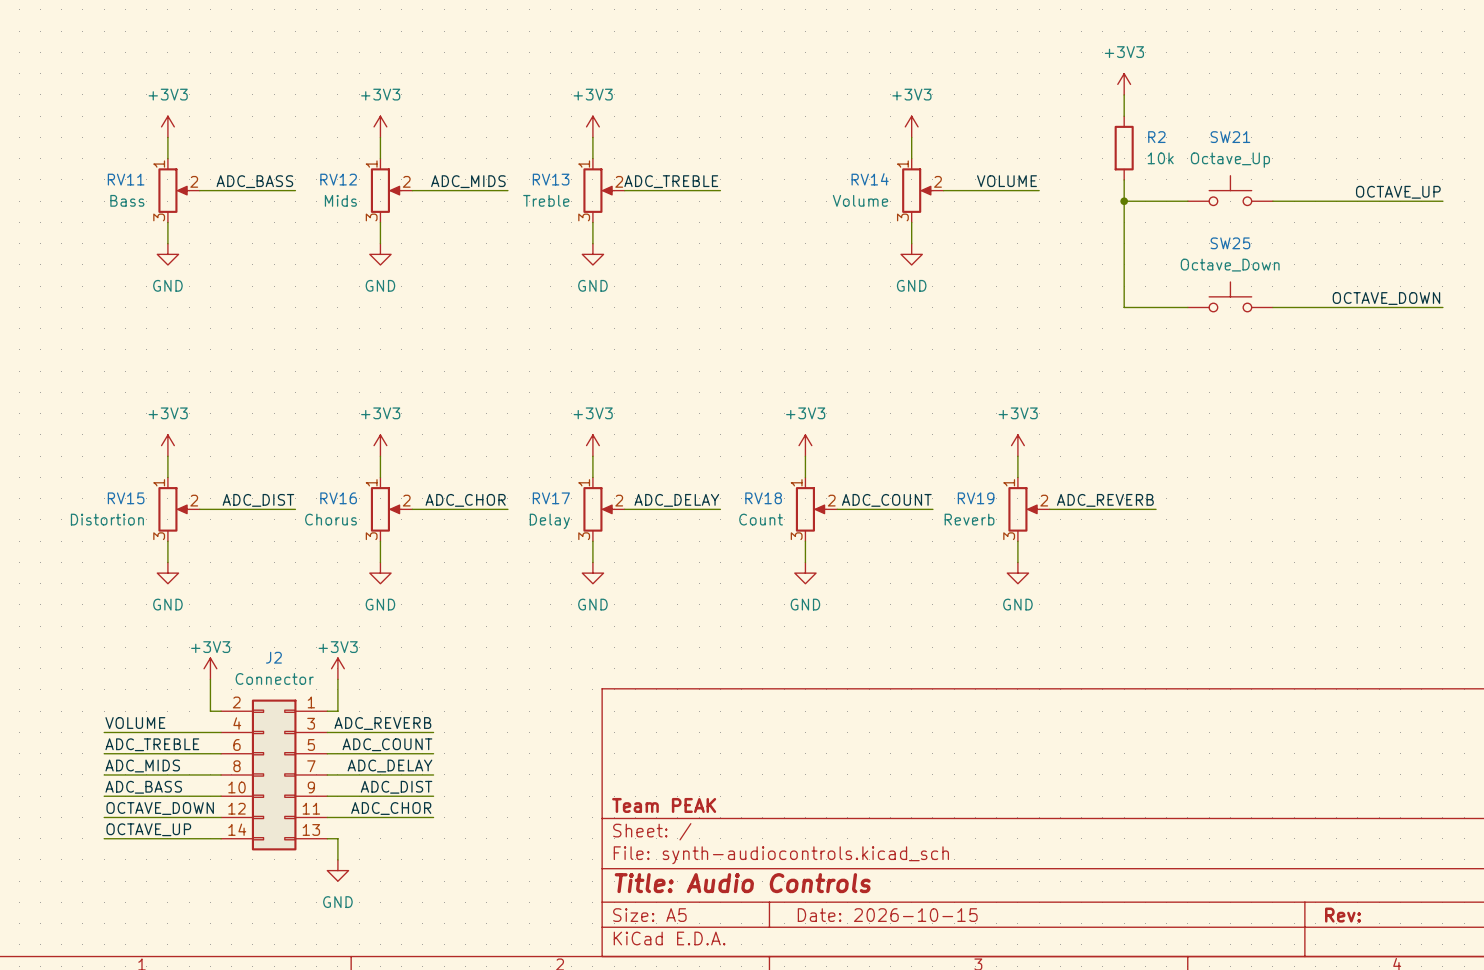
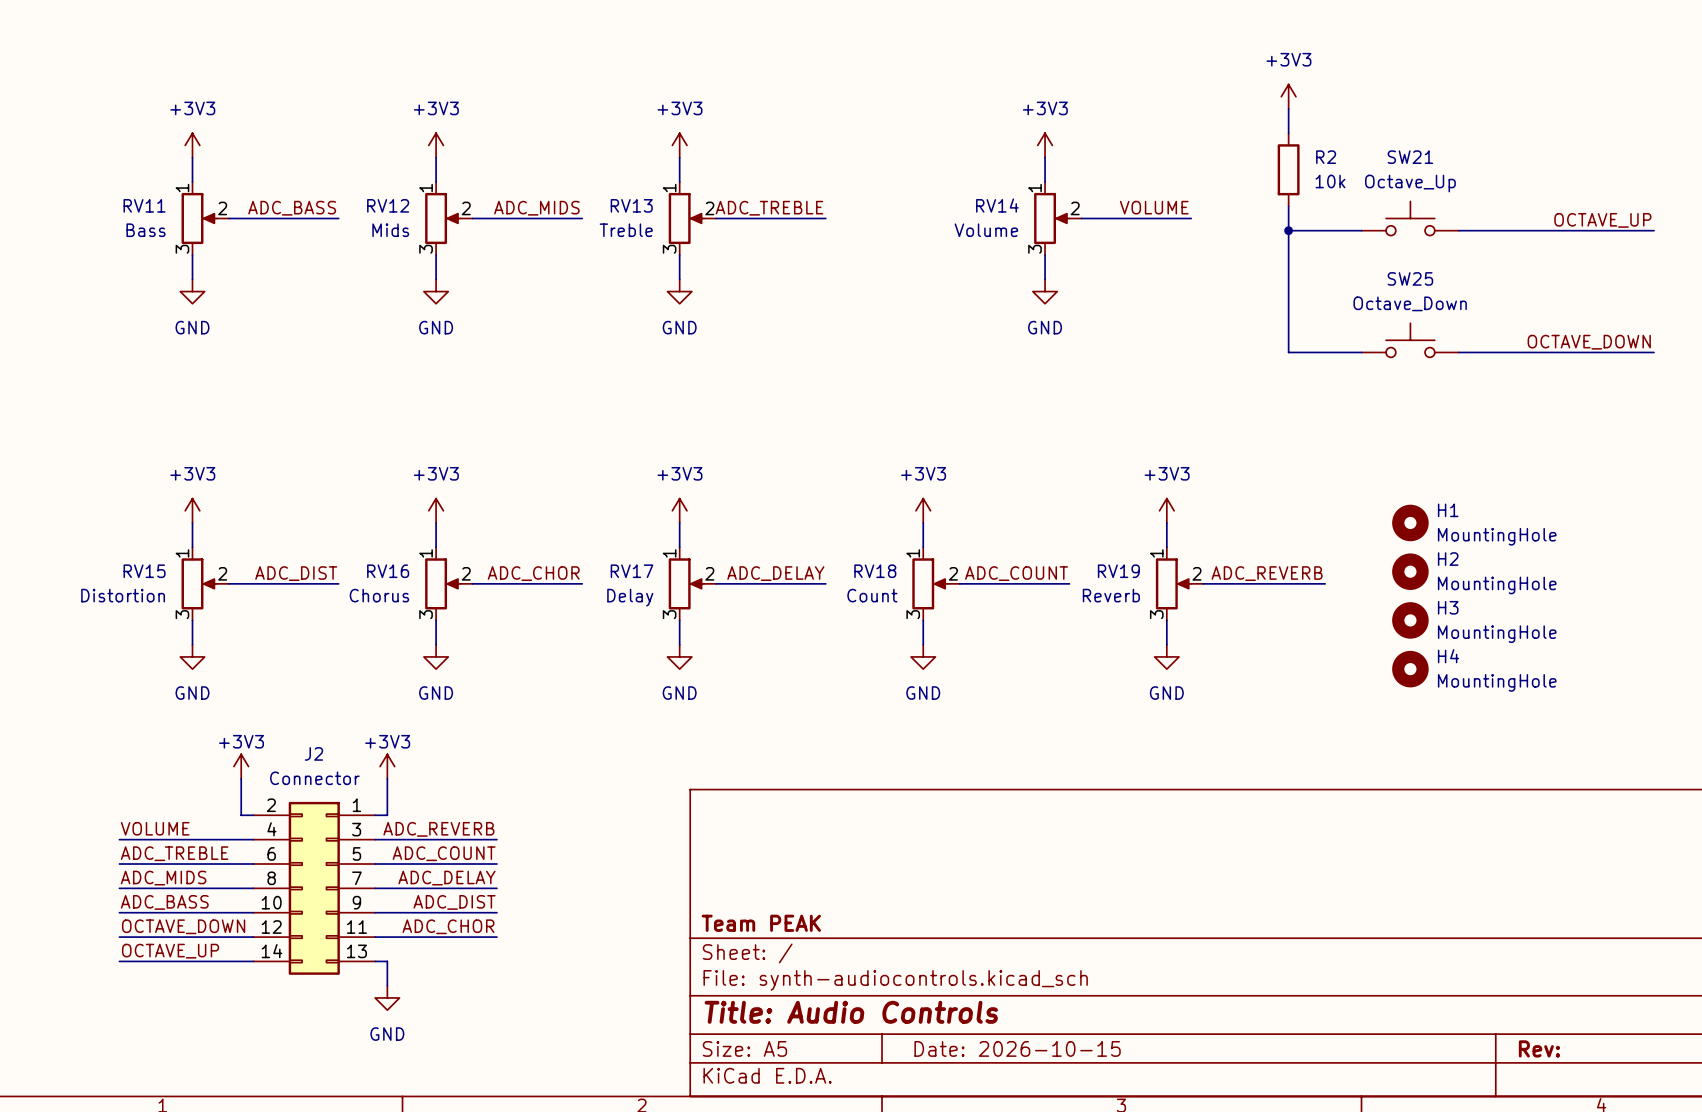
H1: none -> MountingHole (1410, 522)
H2: none -> MountingHole (1410, 571)
H3: none -> MountingHole (1410, 620)
H4: none -> MountingHole (1410, 669)

